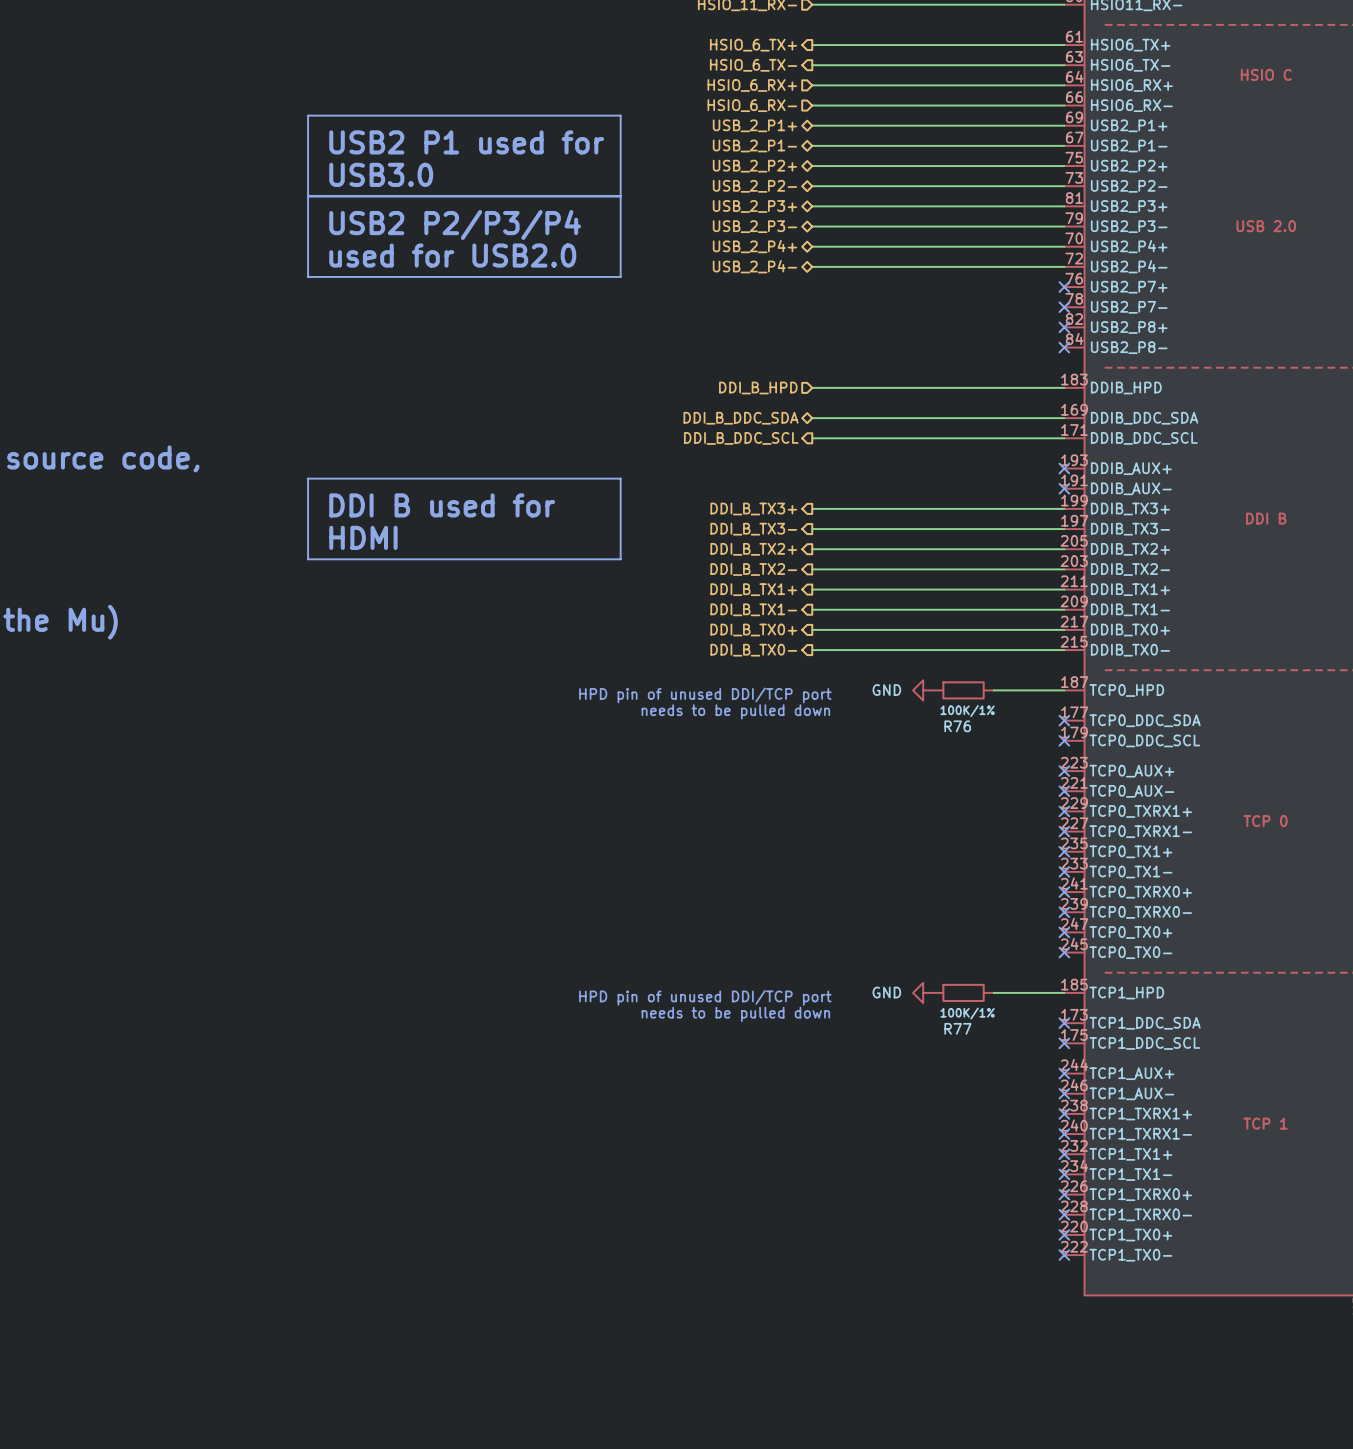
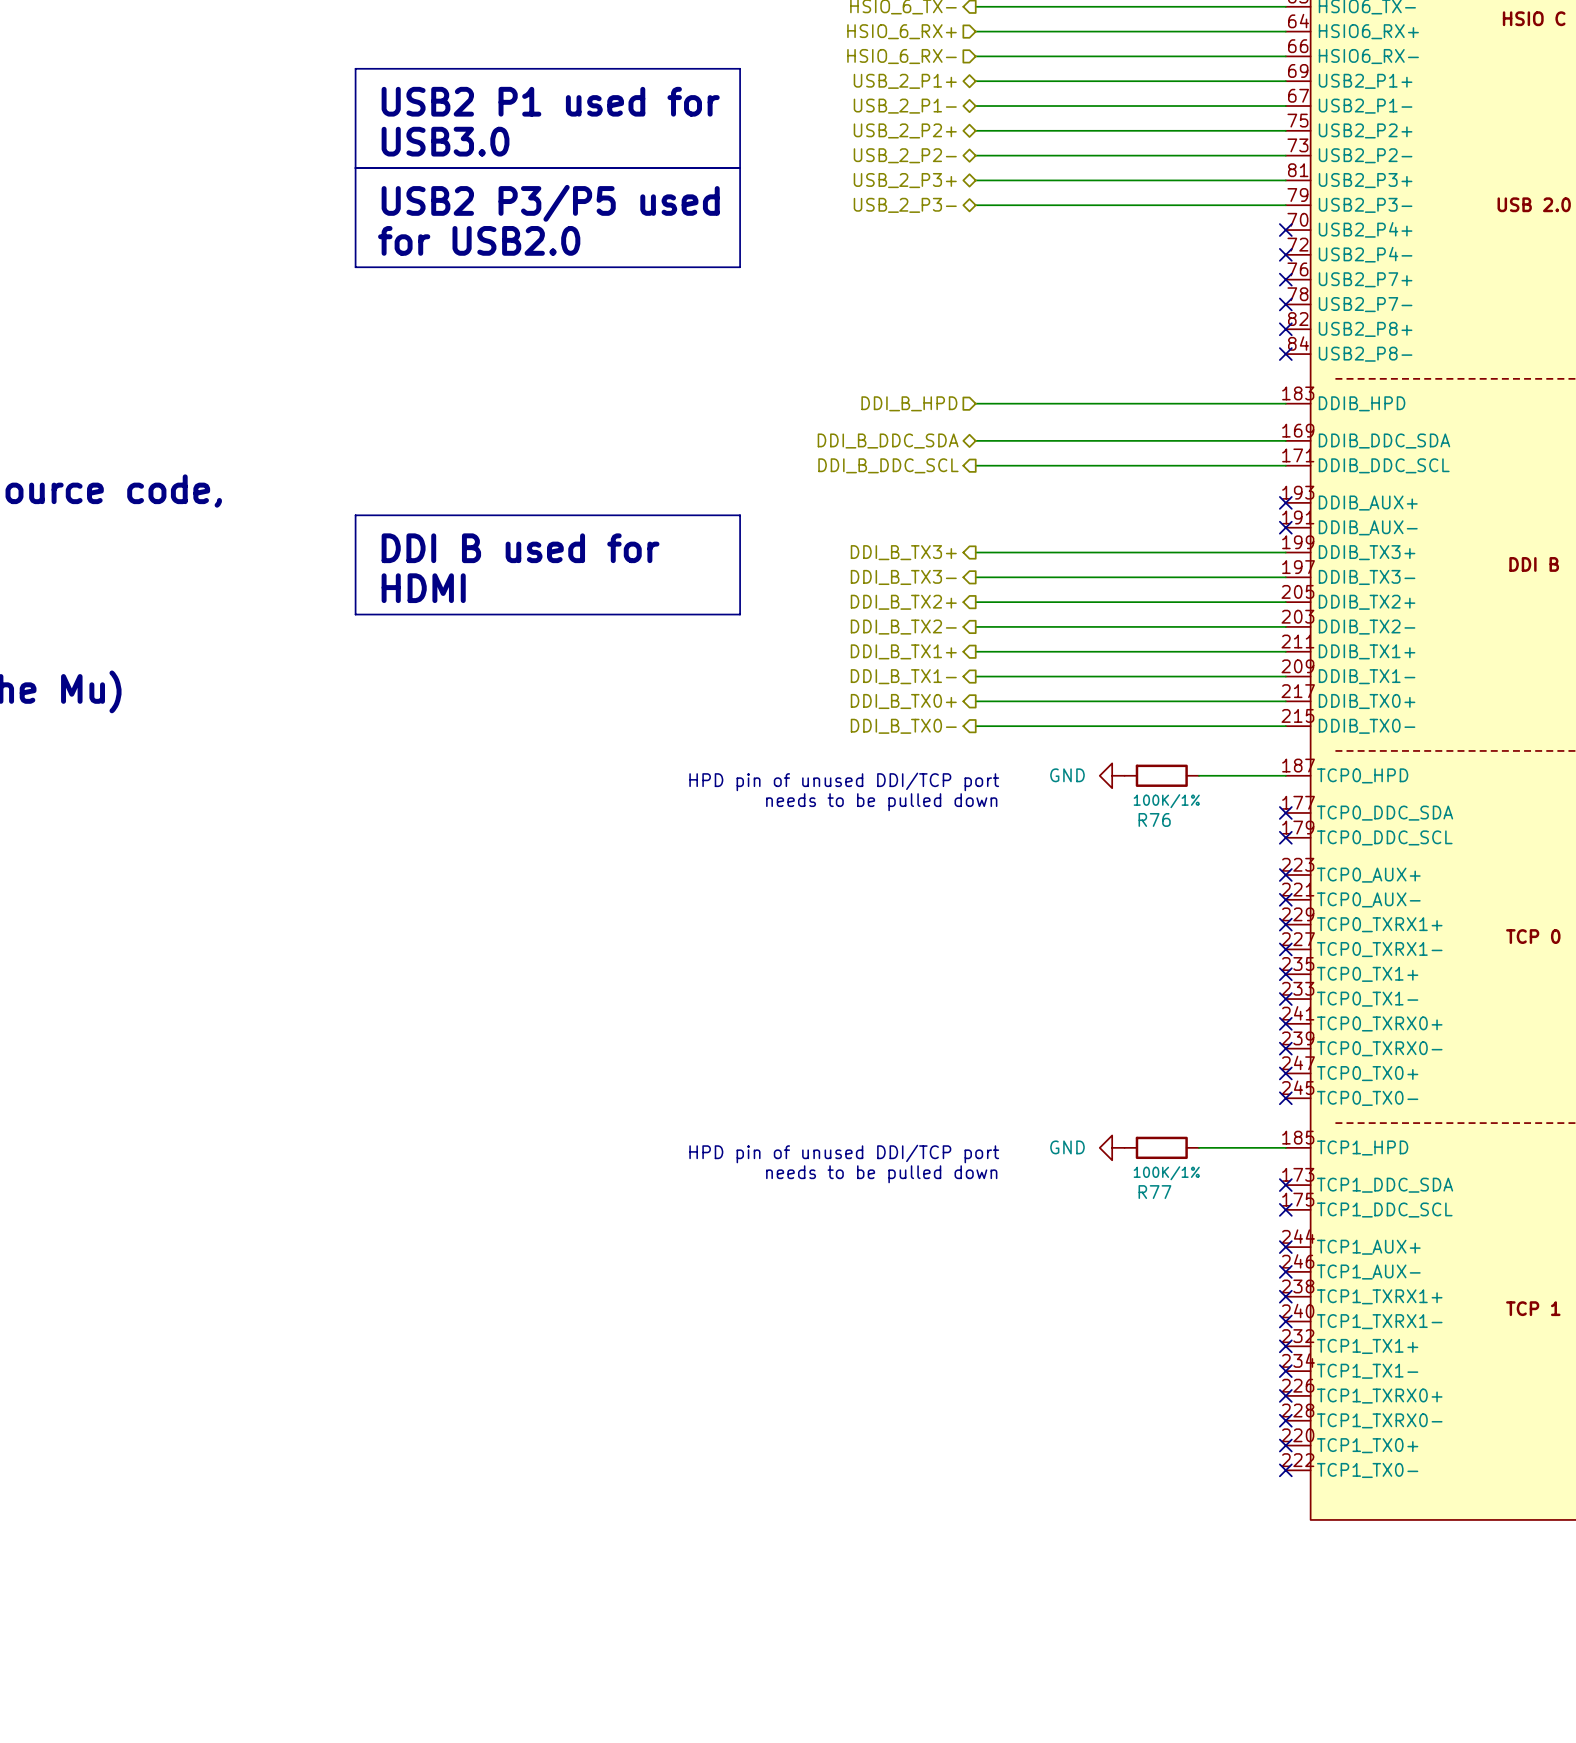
text: USB2 P2/P3/P4 (455, 224) -> USB2 P3/P5 used (550, 203)
hierarchical label: USB_2_P4+ (754, 246) -> none
wire: (812, 246) (1064, 246) -> none
no-connect mark: none -> (1285, 230)
text: used for USB2.0 (452, 255) -> for USB2.0 (479, 240)
hierarchical label: USB_2_P4- (754, 266) -> none
wire: (812, 266) (1064, 266) -> none
no-connect mark: none -> (1285, 254)

